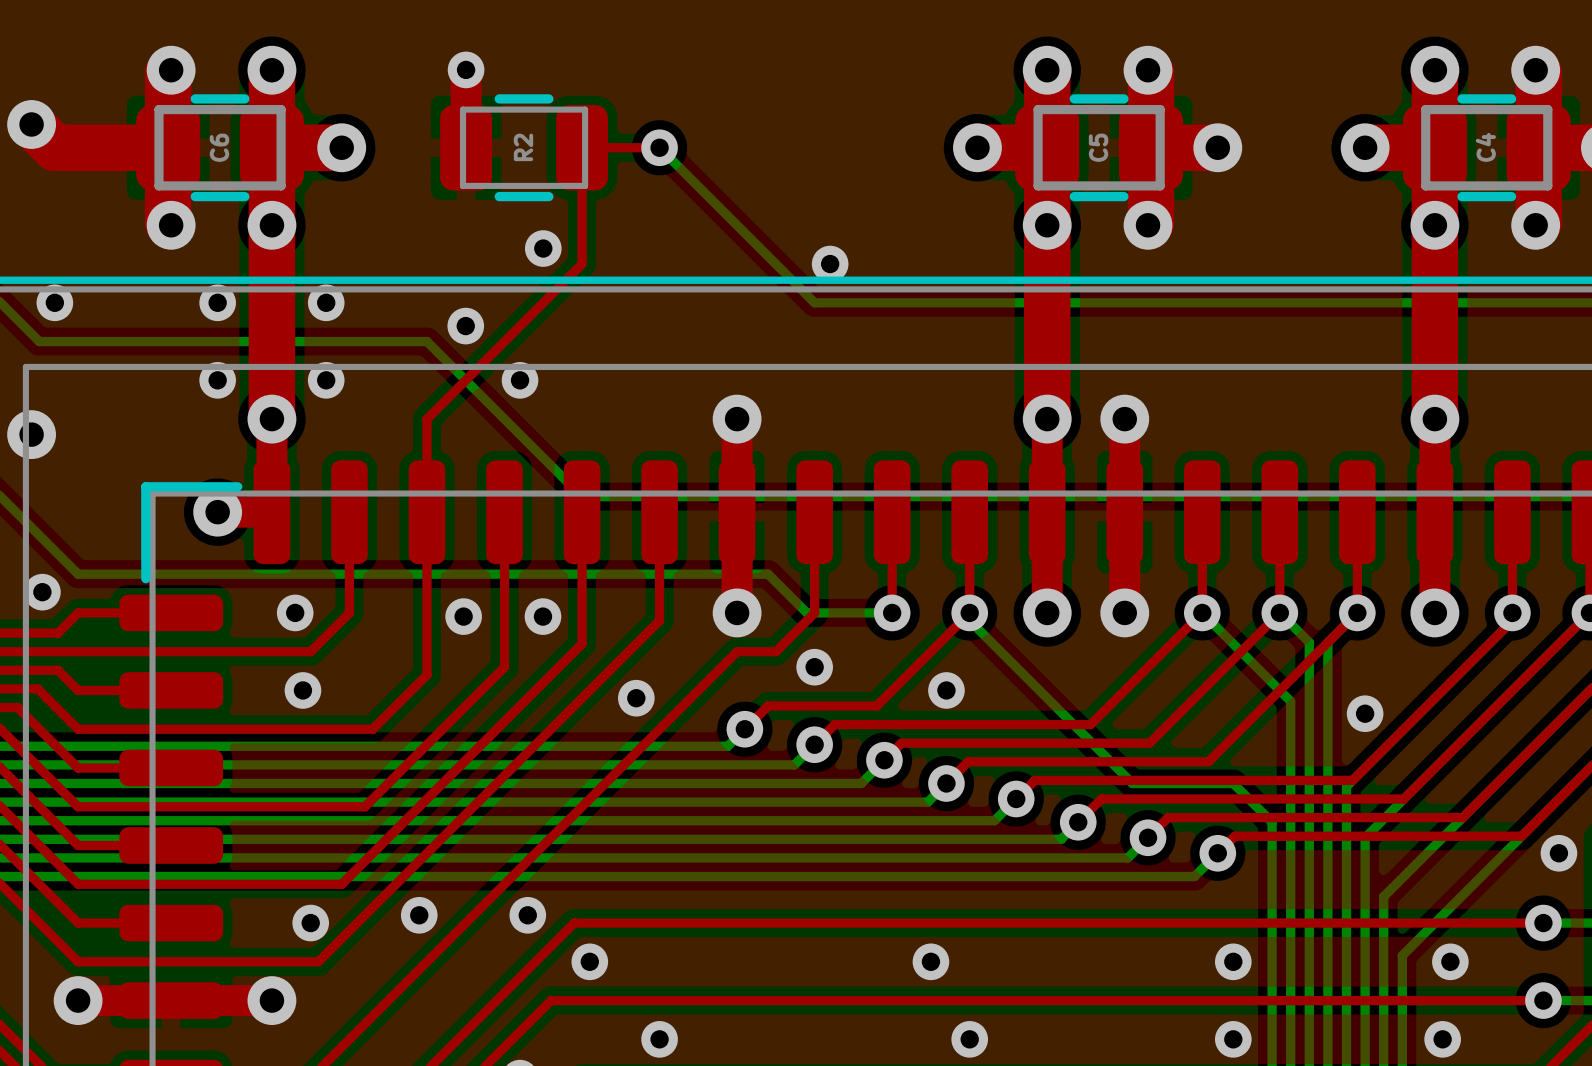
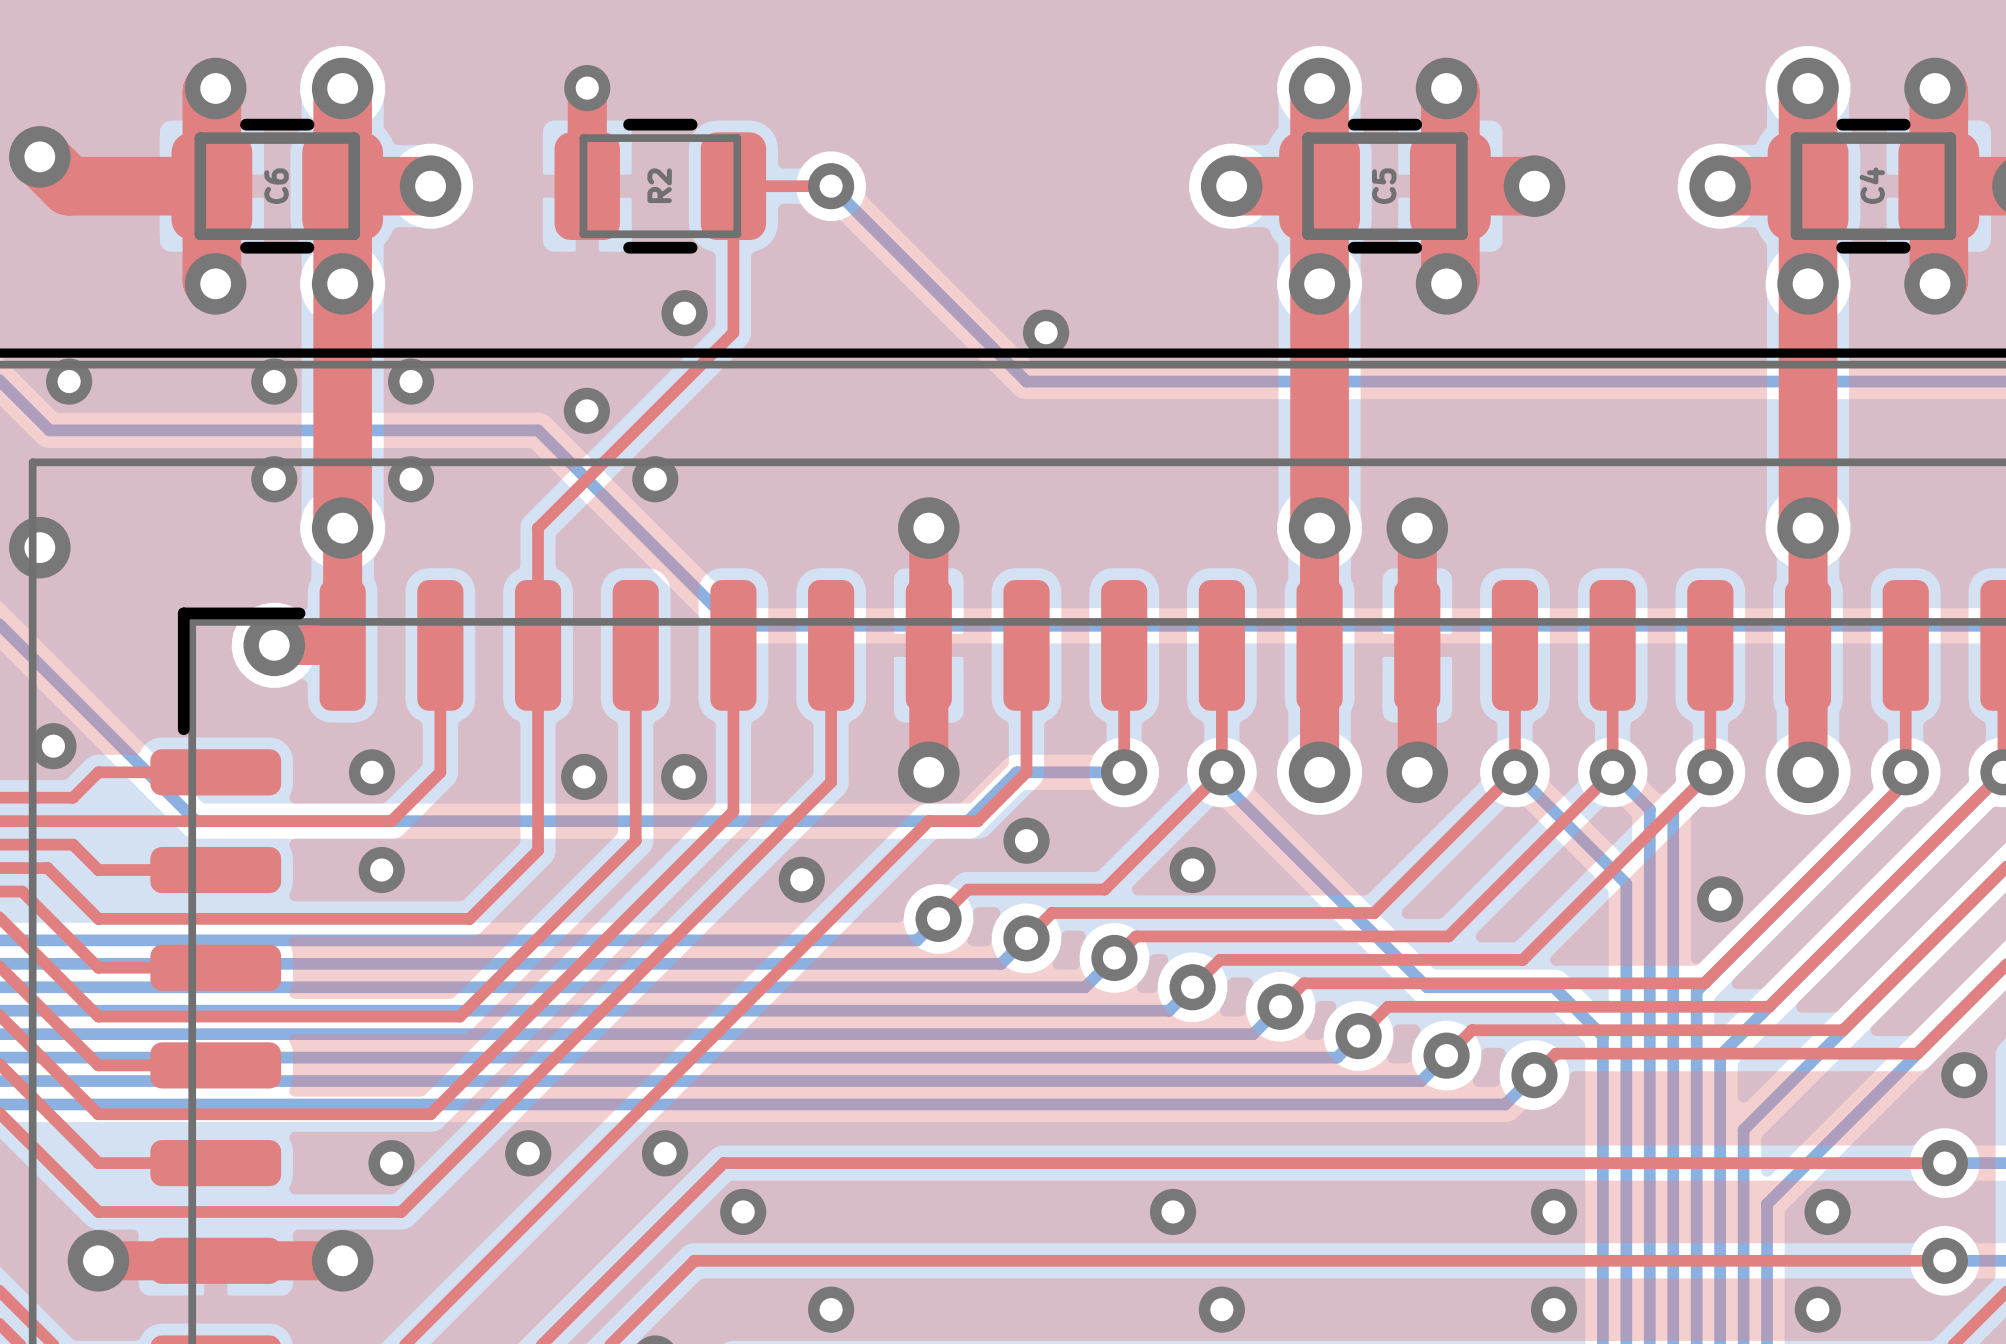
bottom track: (78, 574) (768, 574) (806, 612) -> (98, 723) (196, 821) (967, 821) (1016, 772)

